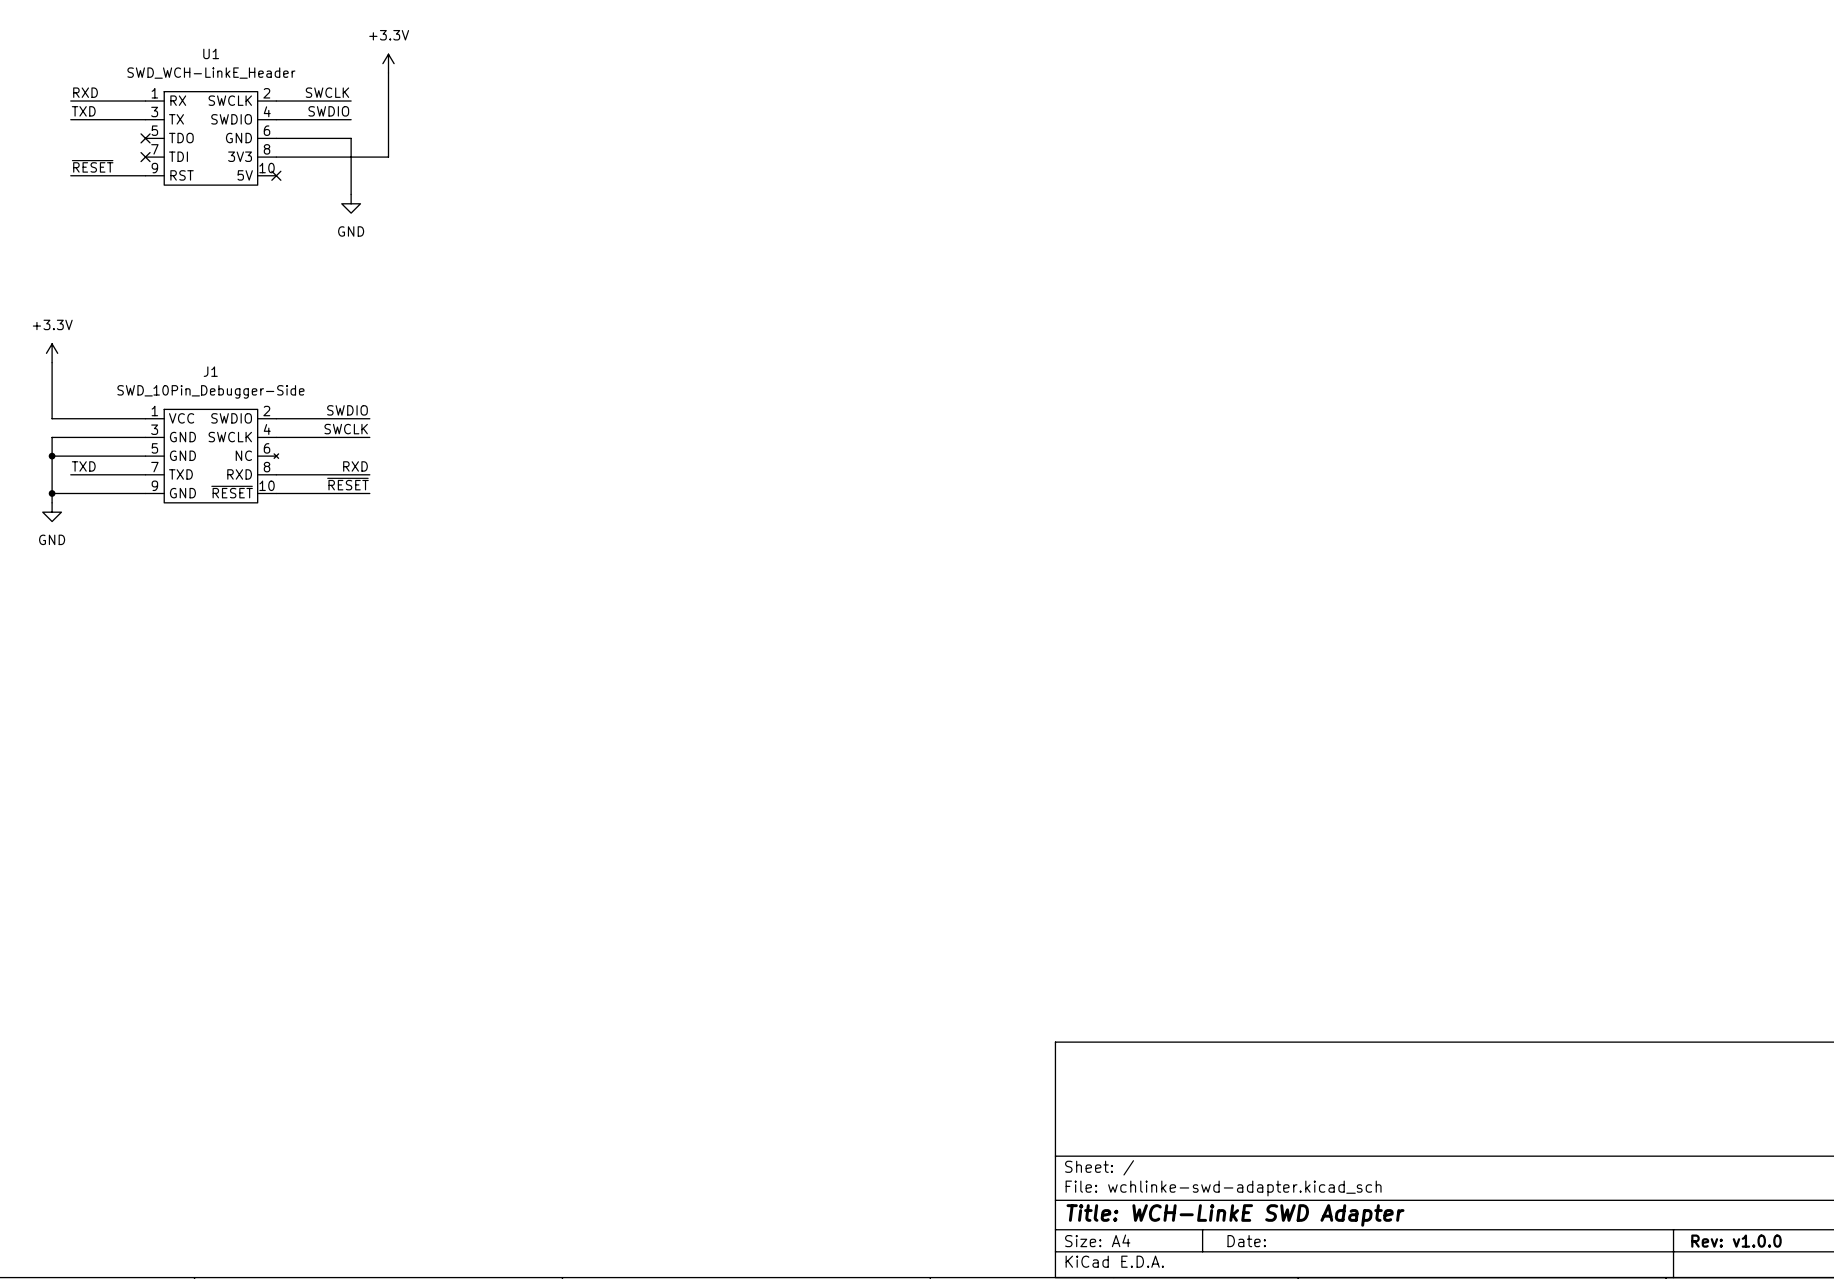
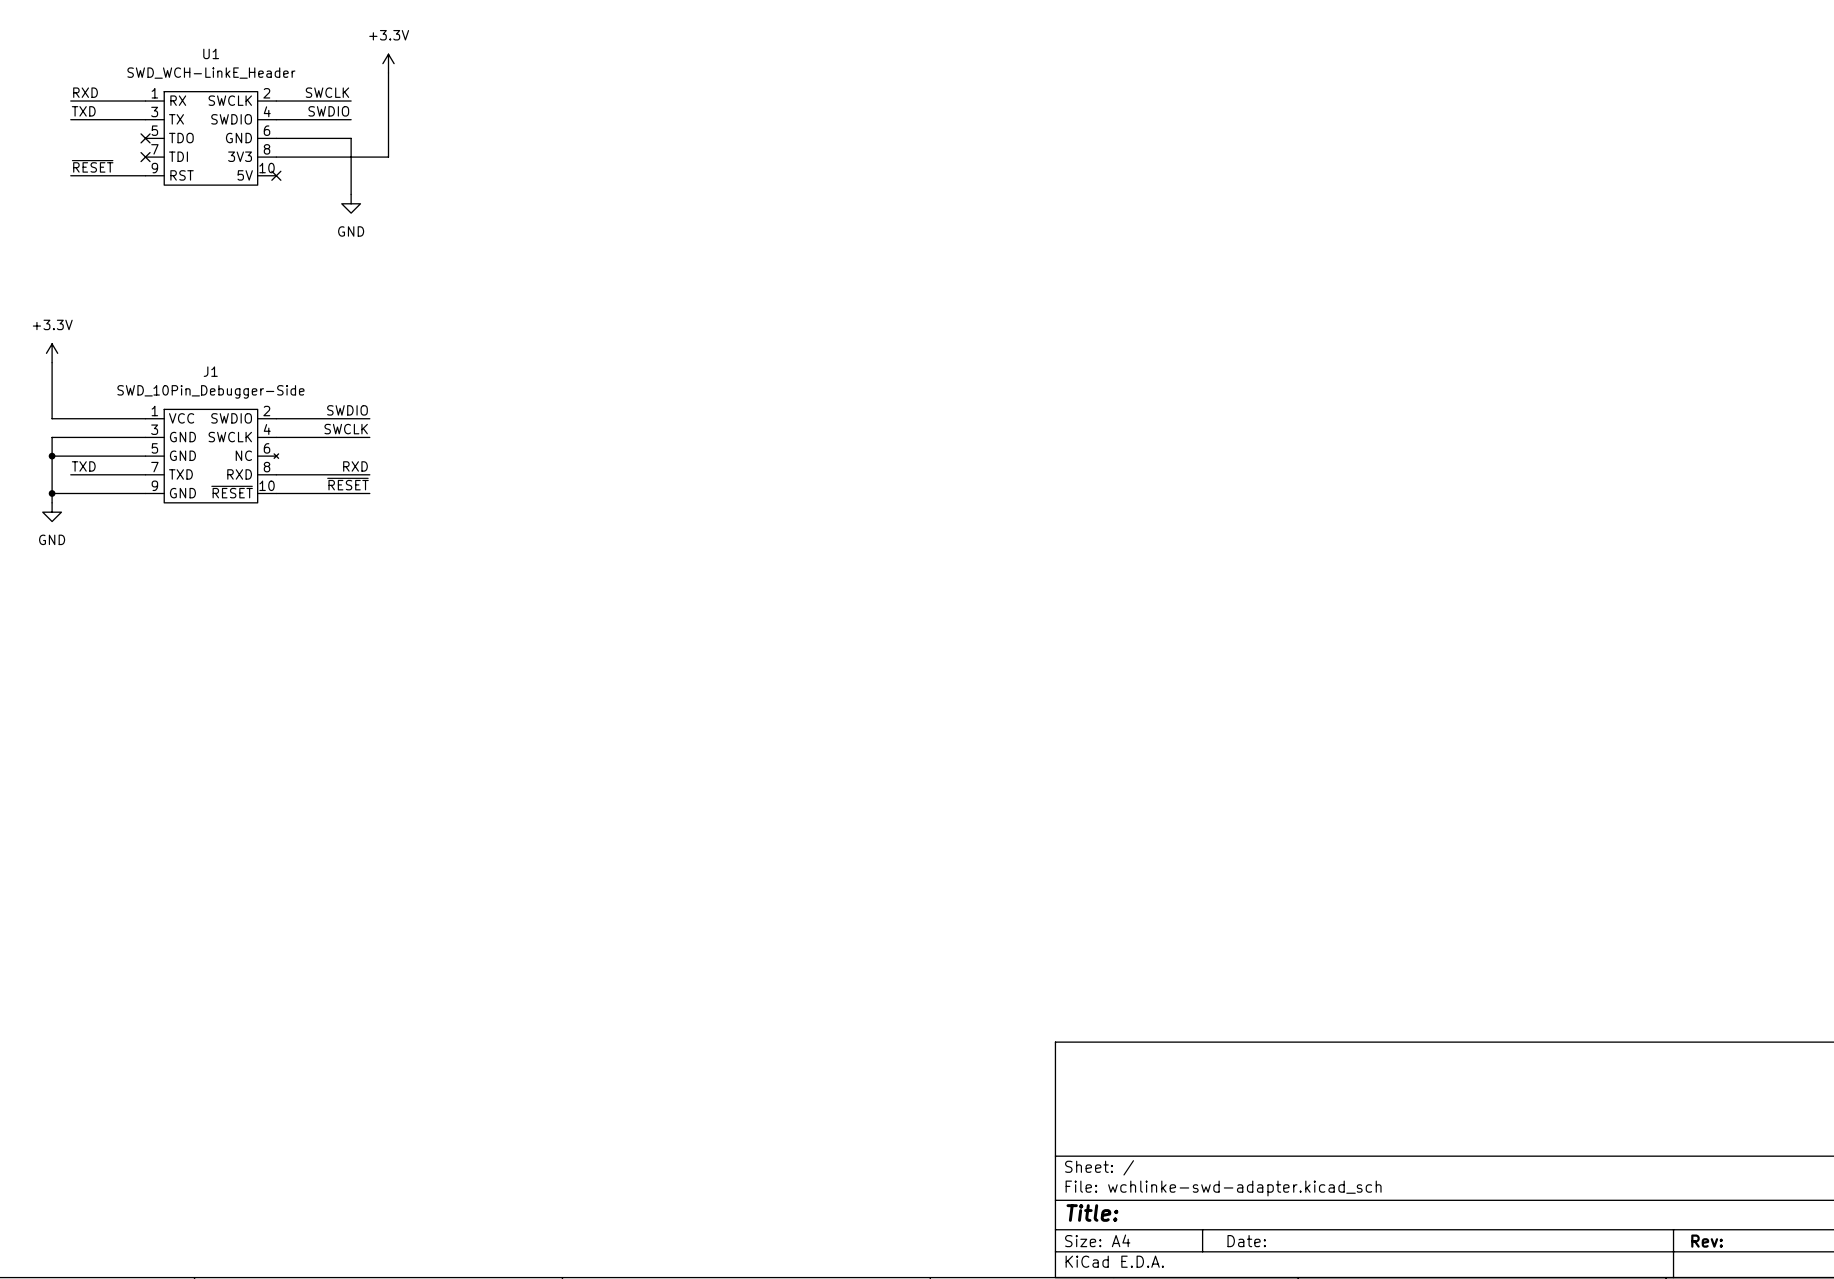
title block: Title: WCH-LinkE SWD Adapter (1235, 1215) -> Title: (1092, 1213)
title block: Rev: v1.0.0 (1736, 1241) -> Rev: (1707, 1241)

